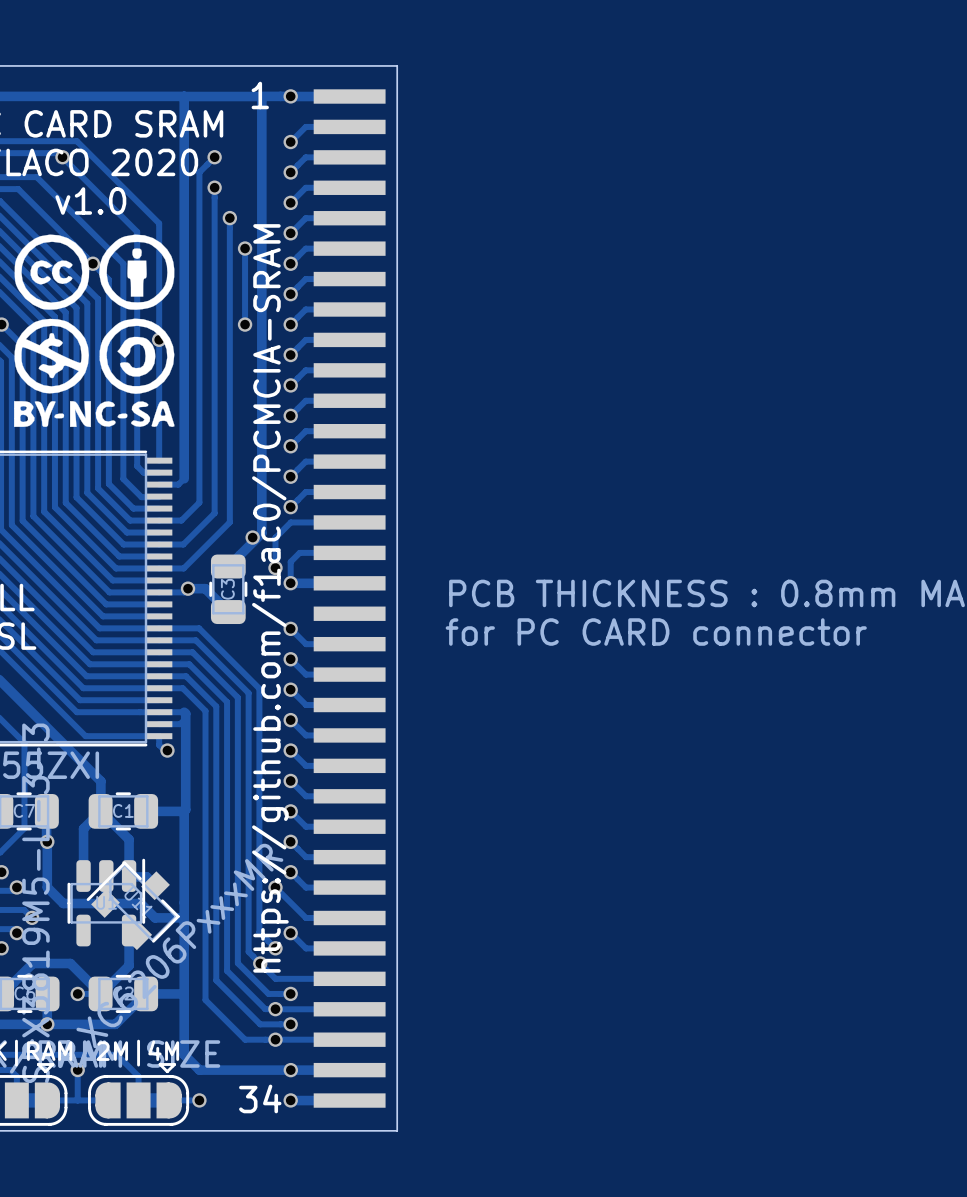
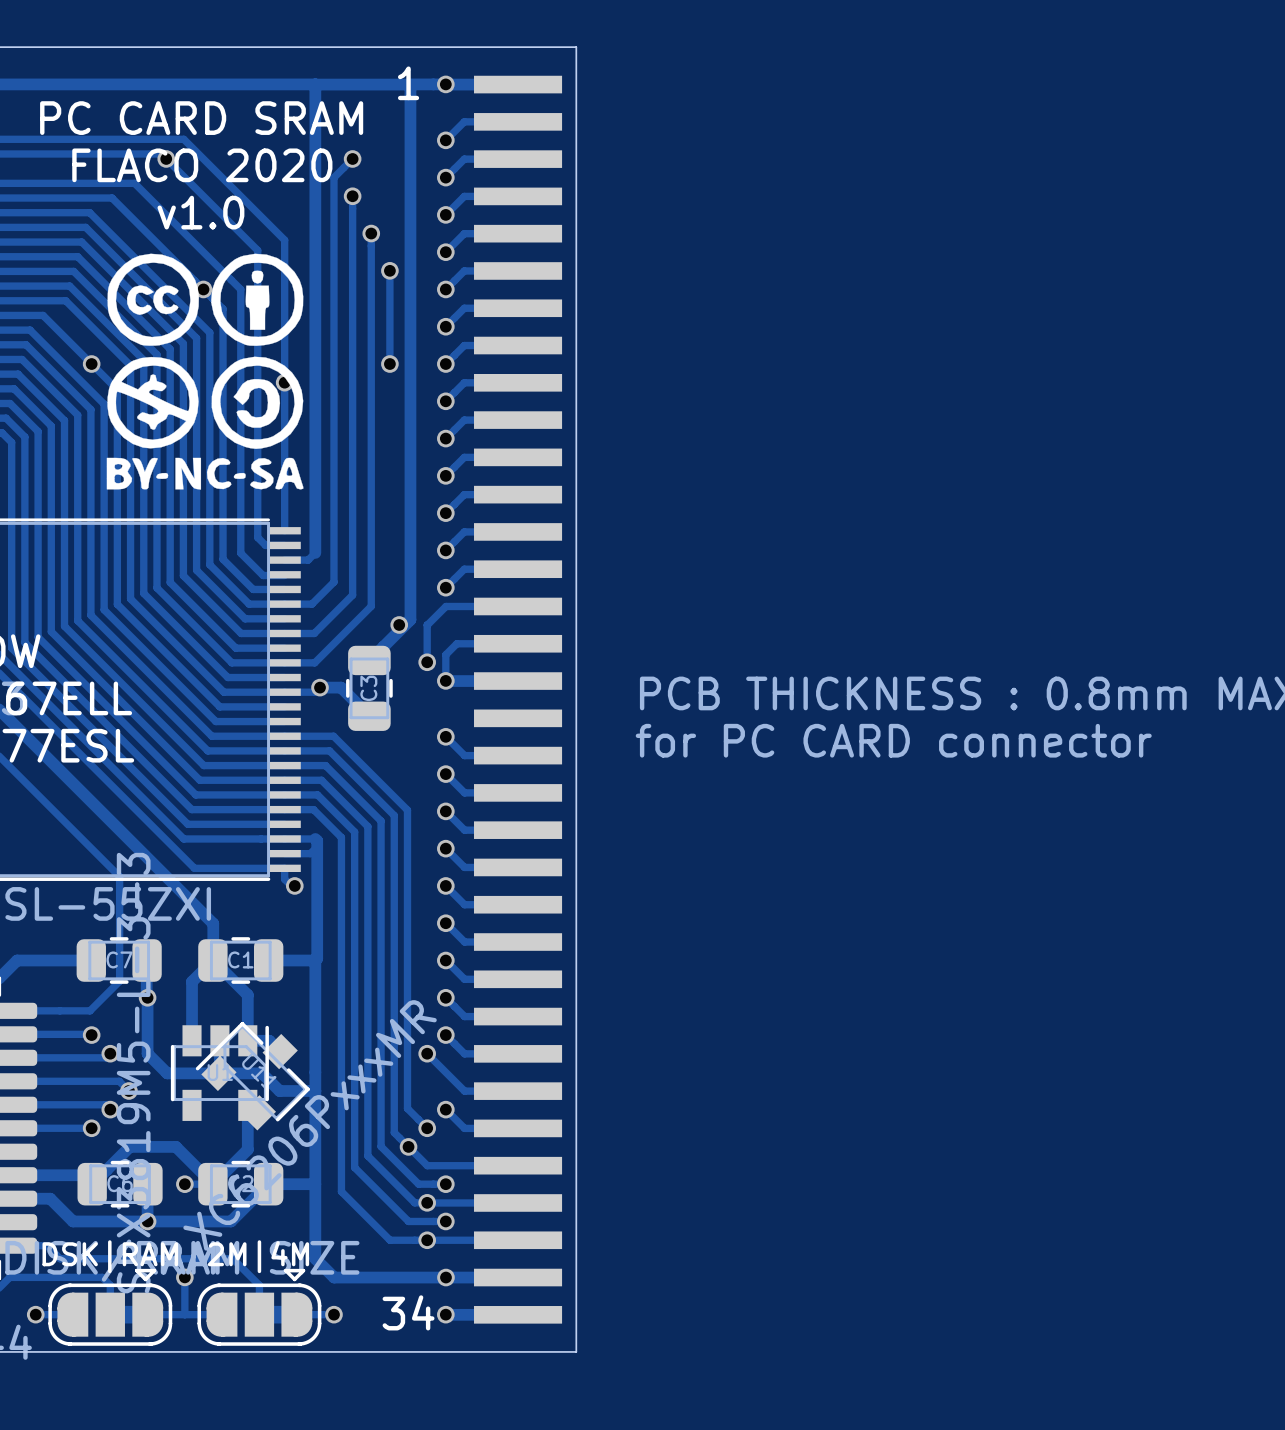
text: https://github.com/f1ac0/PCMCIA-SRAM (270, 598) -> none
part footprint: [67, 858, 146, 947] -> [170, 1025, 269, 1121]

